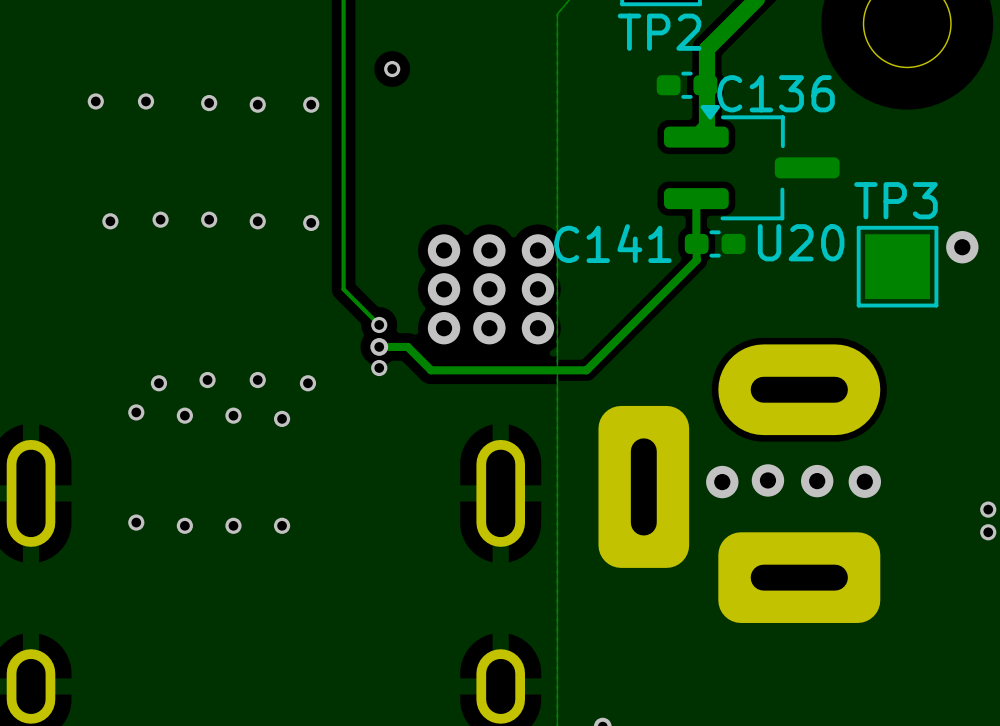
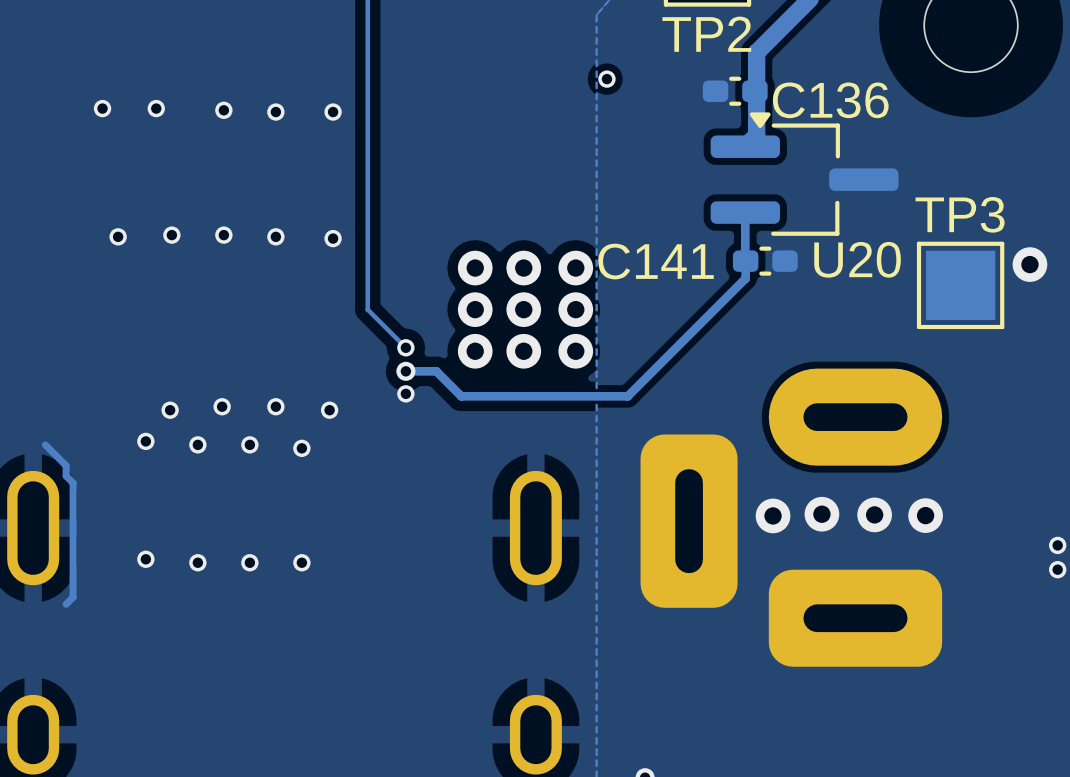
via position: (392, 69) -> (606, 79)
track: none -> (45, 444) (66, 465) (66, 476) (73, 483) (73, 597) (66, 604)

